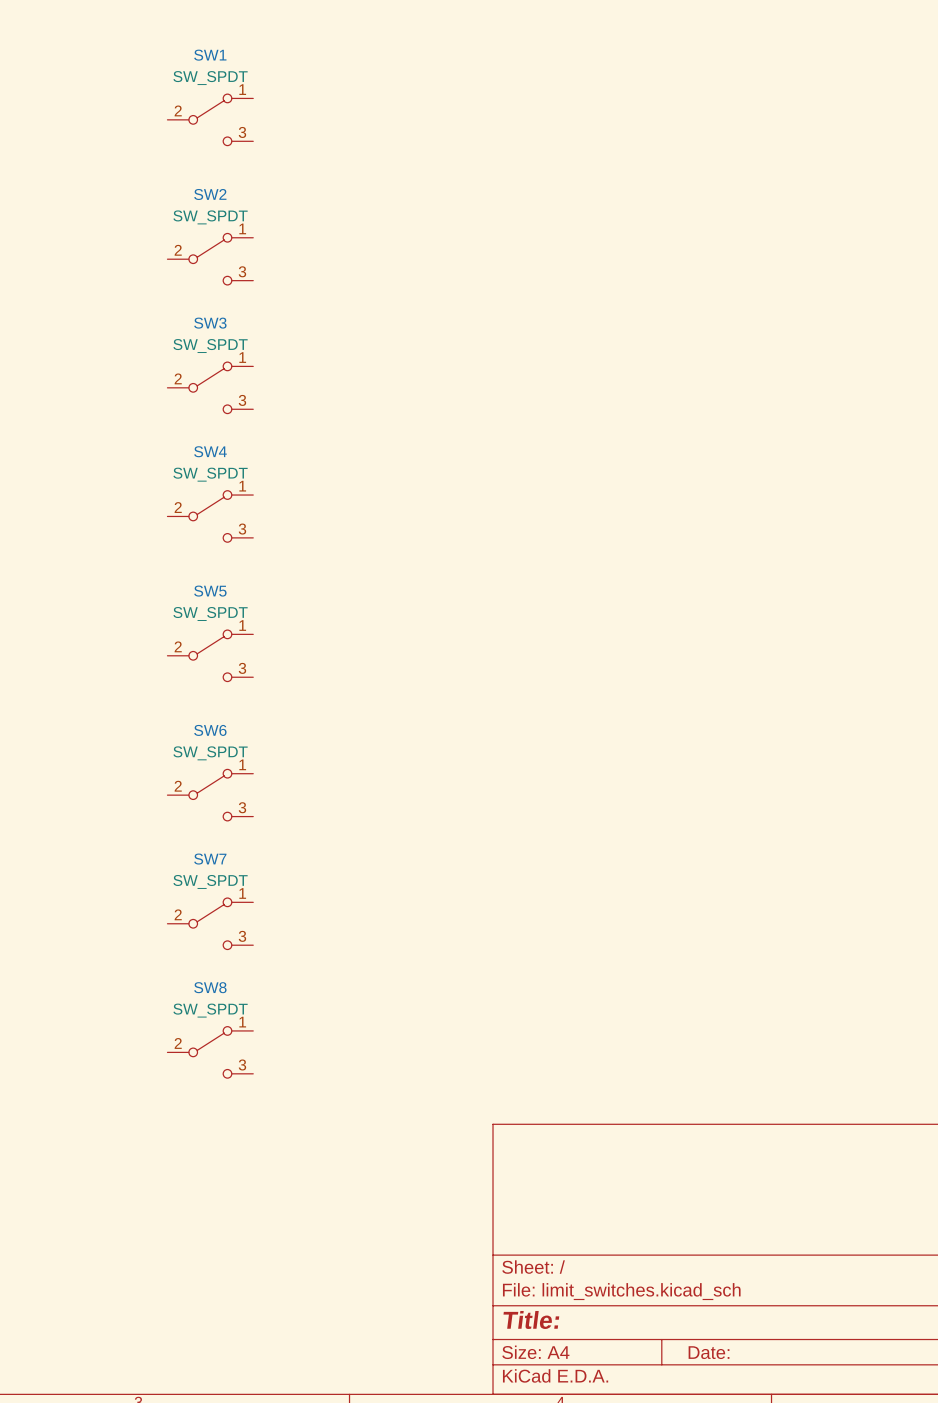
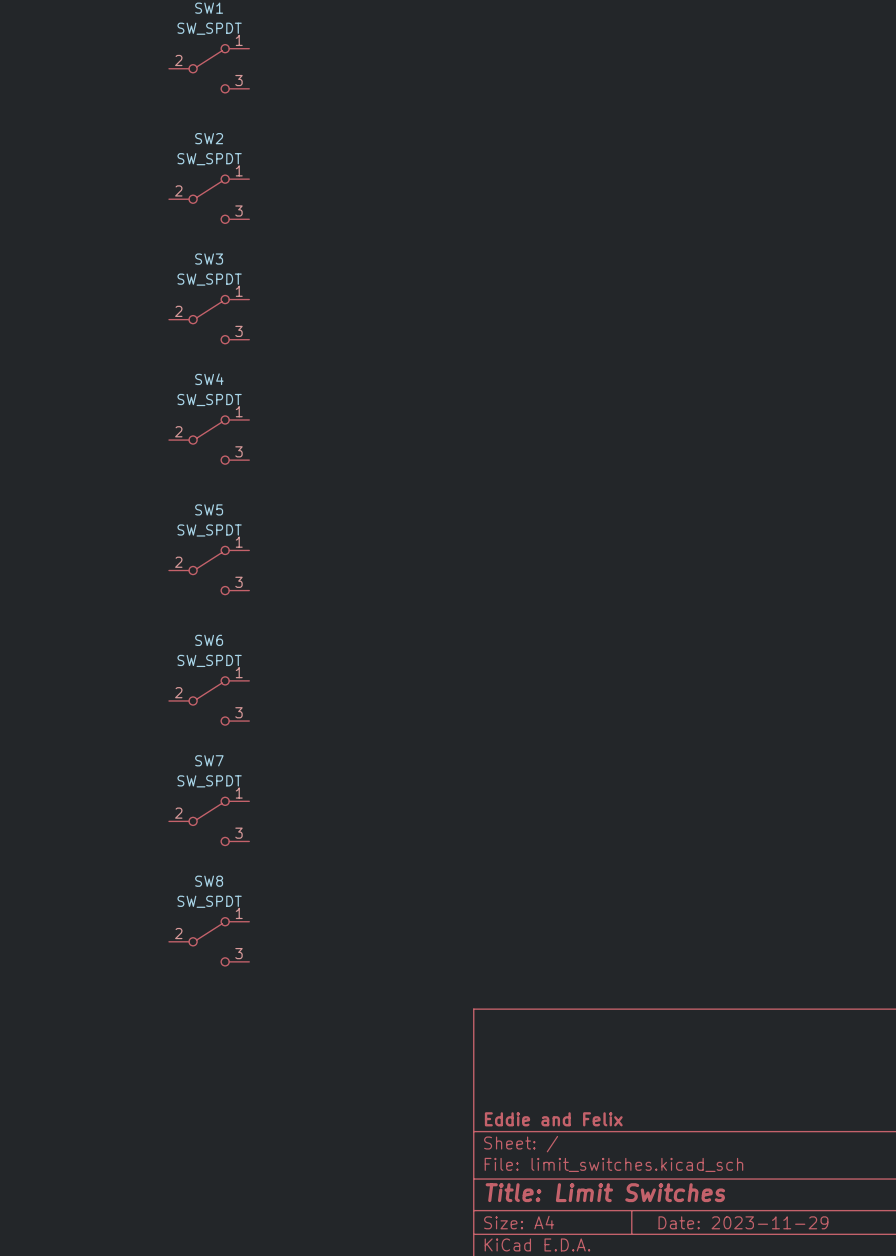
title block: none -> Eddie and Felix (553, 1119)
title block: Title: (531, 1319) -> Title: Limit Switches (605, 1192)
title block: Date: (709, 1352) -> Date: 2023-11-29 (743, 1222)

